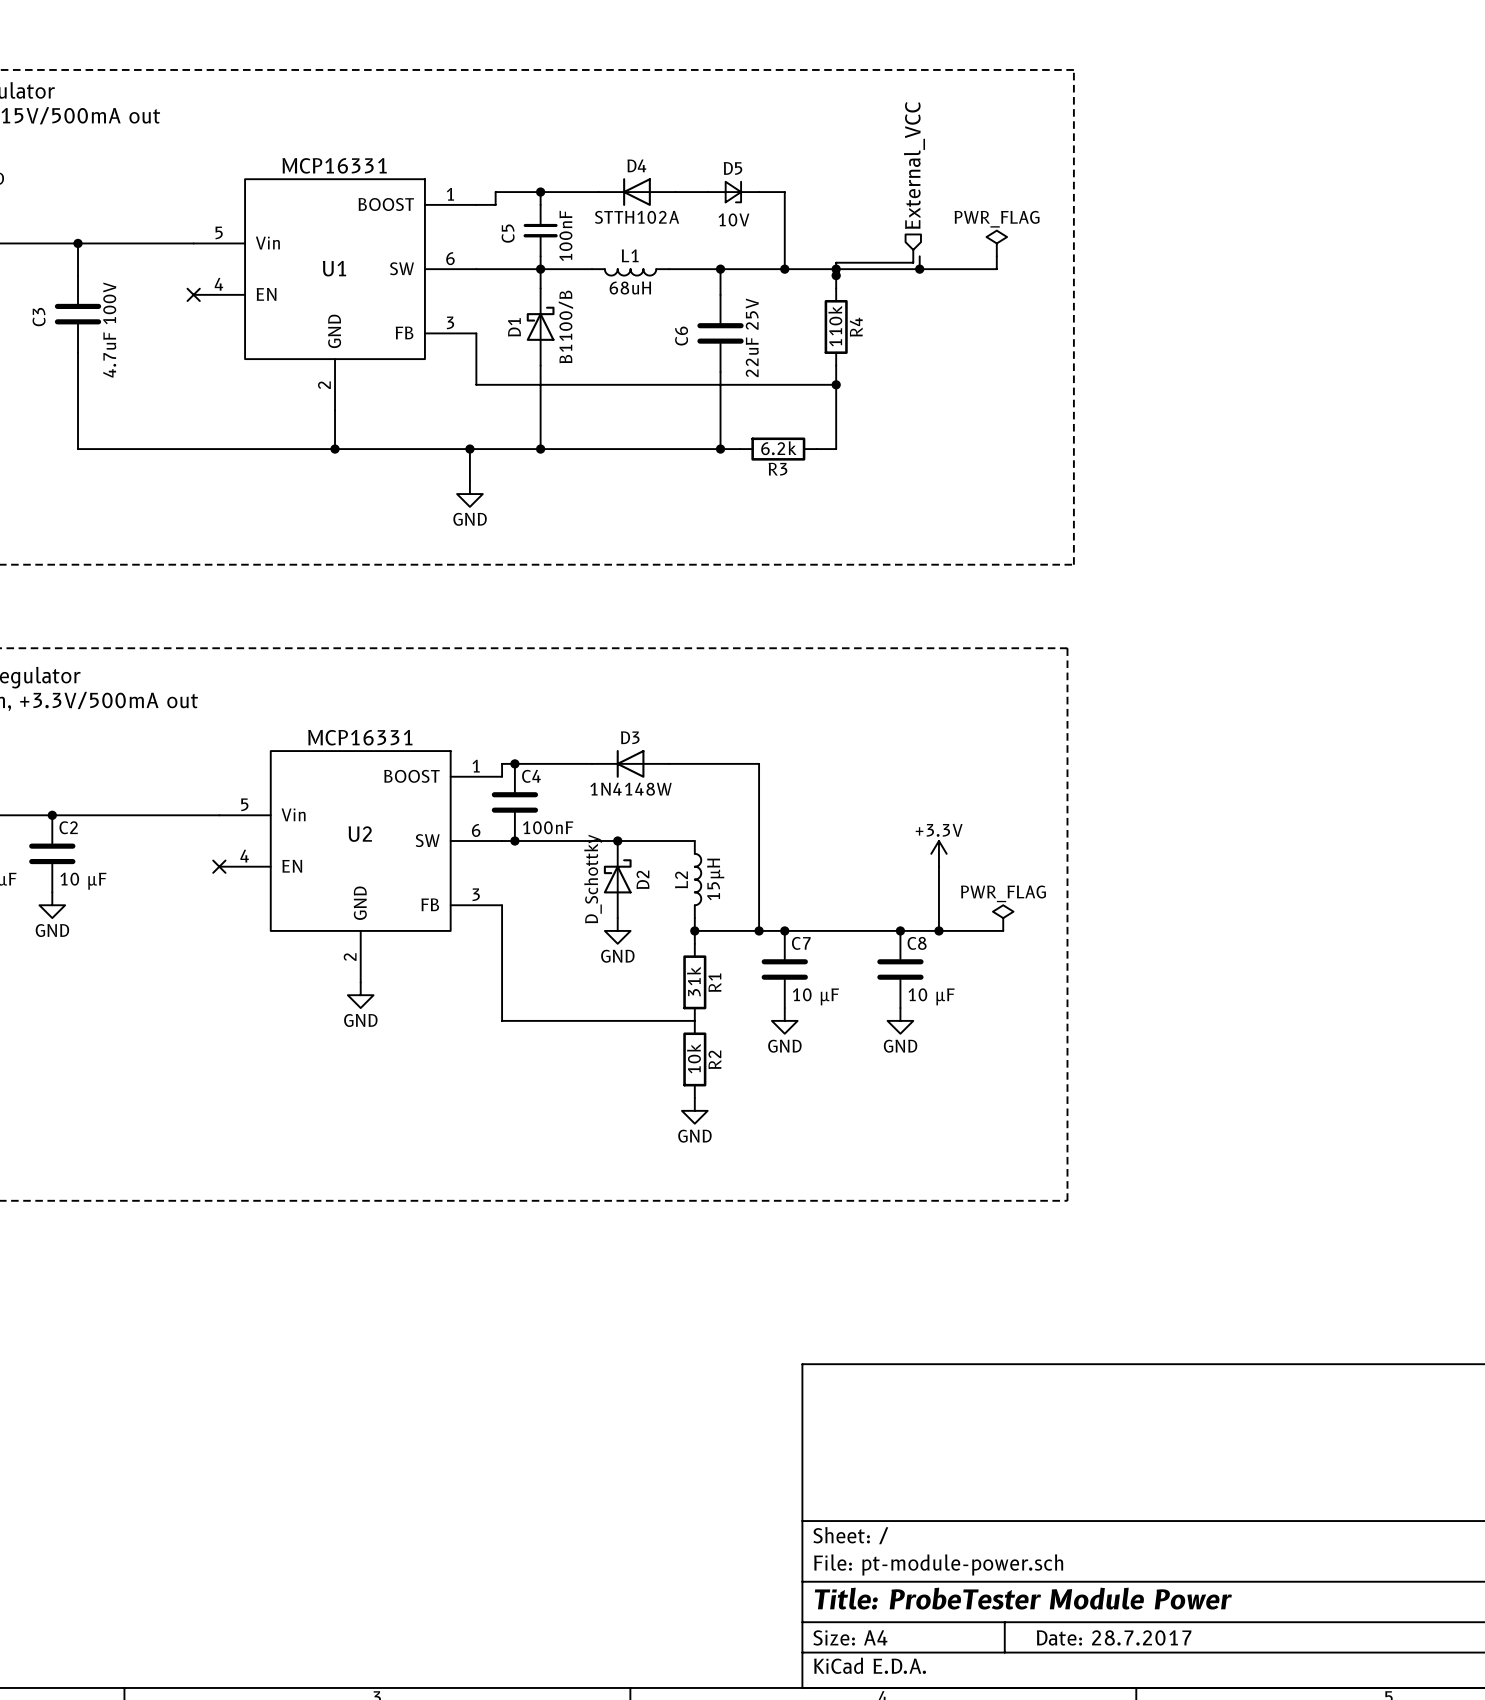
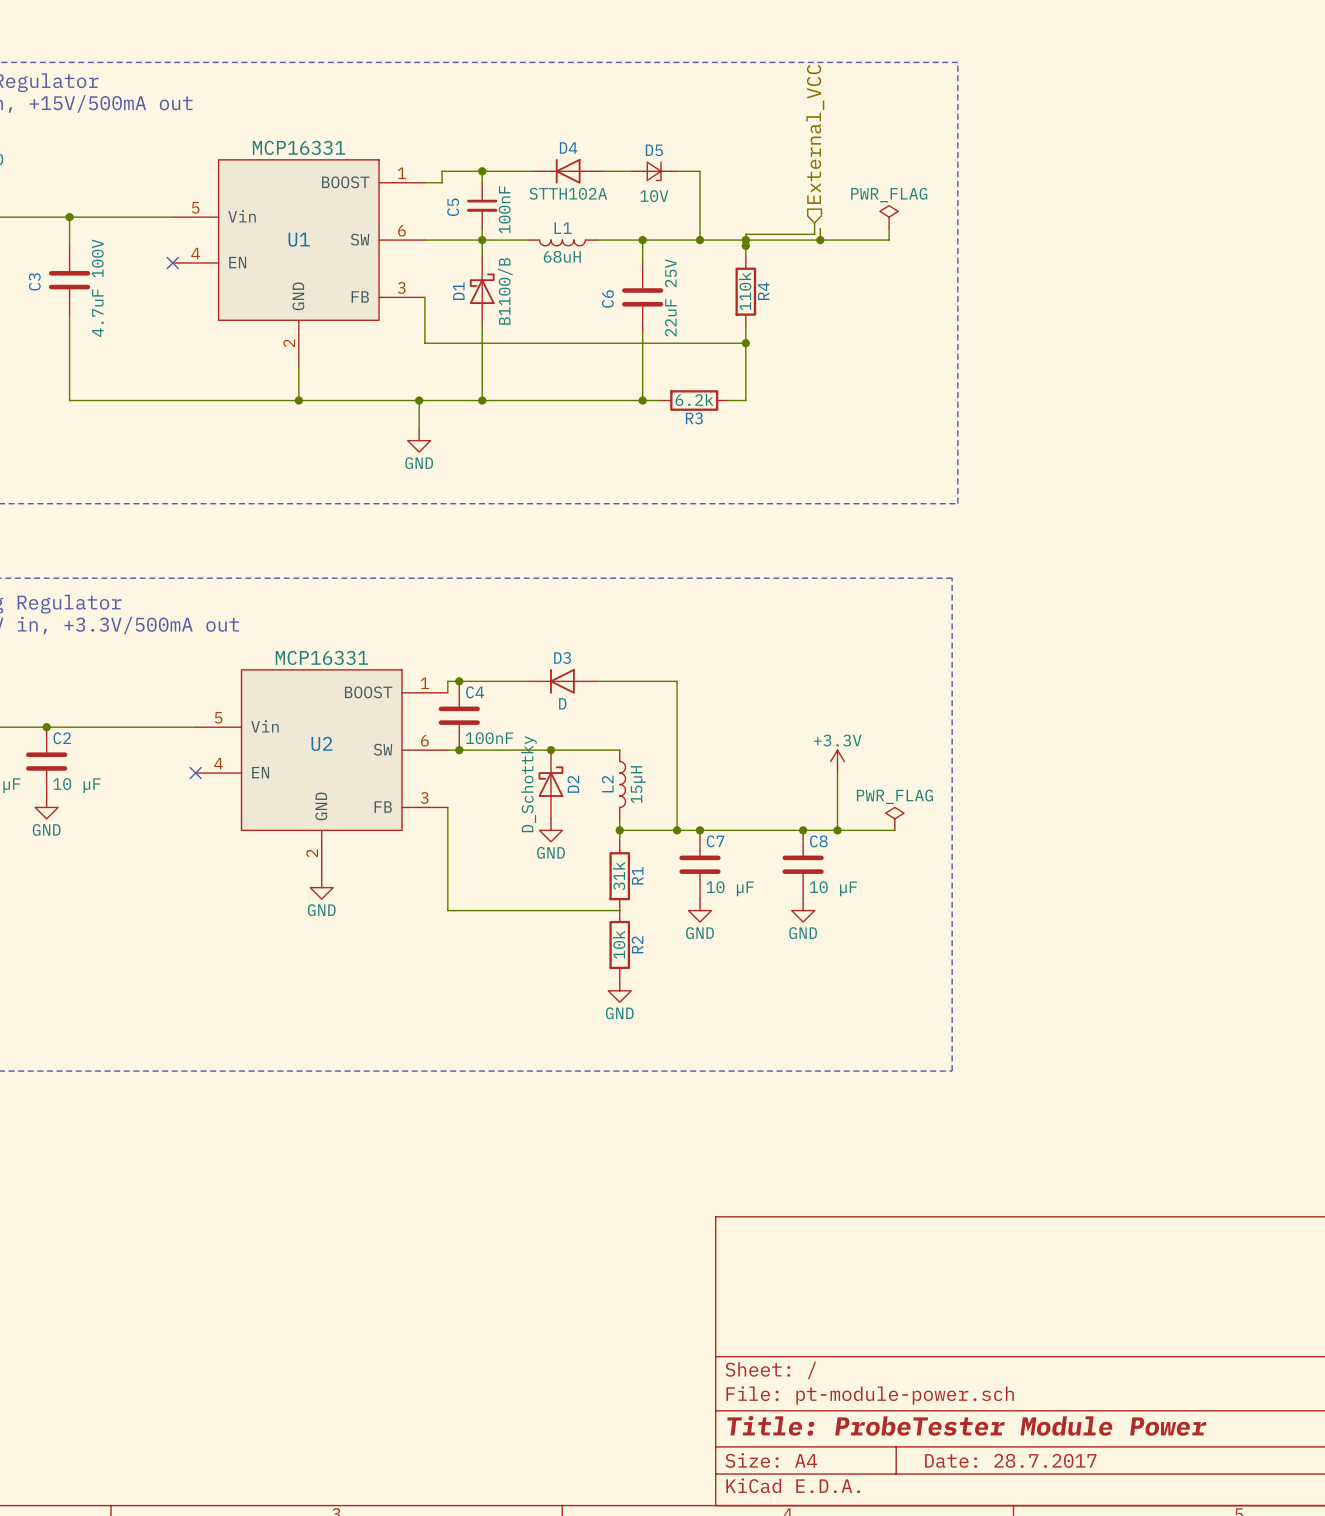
D3 value: 1N4148W (631, 789) -> D (562, 703)

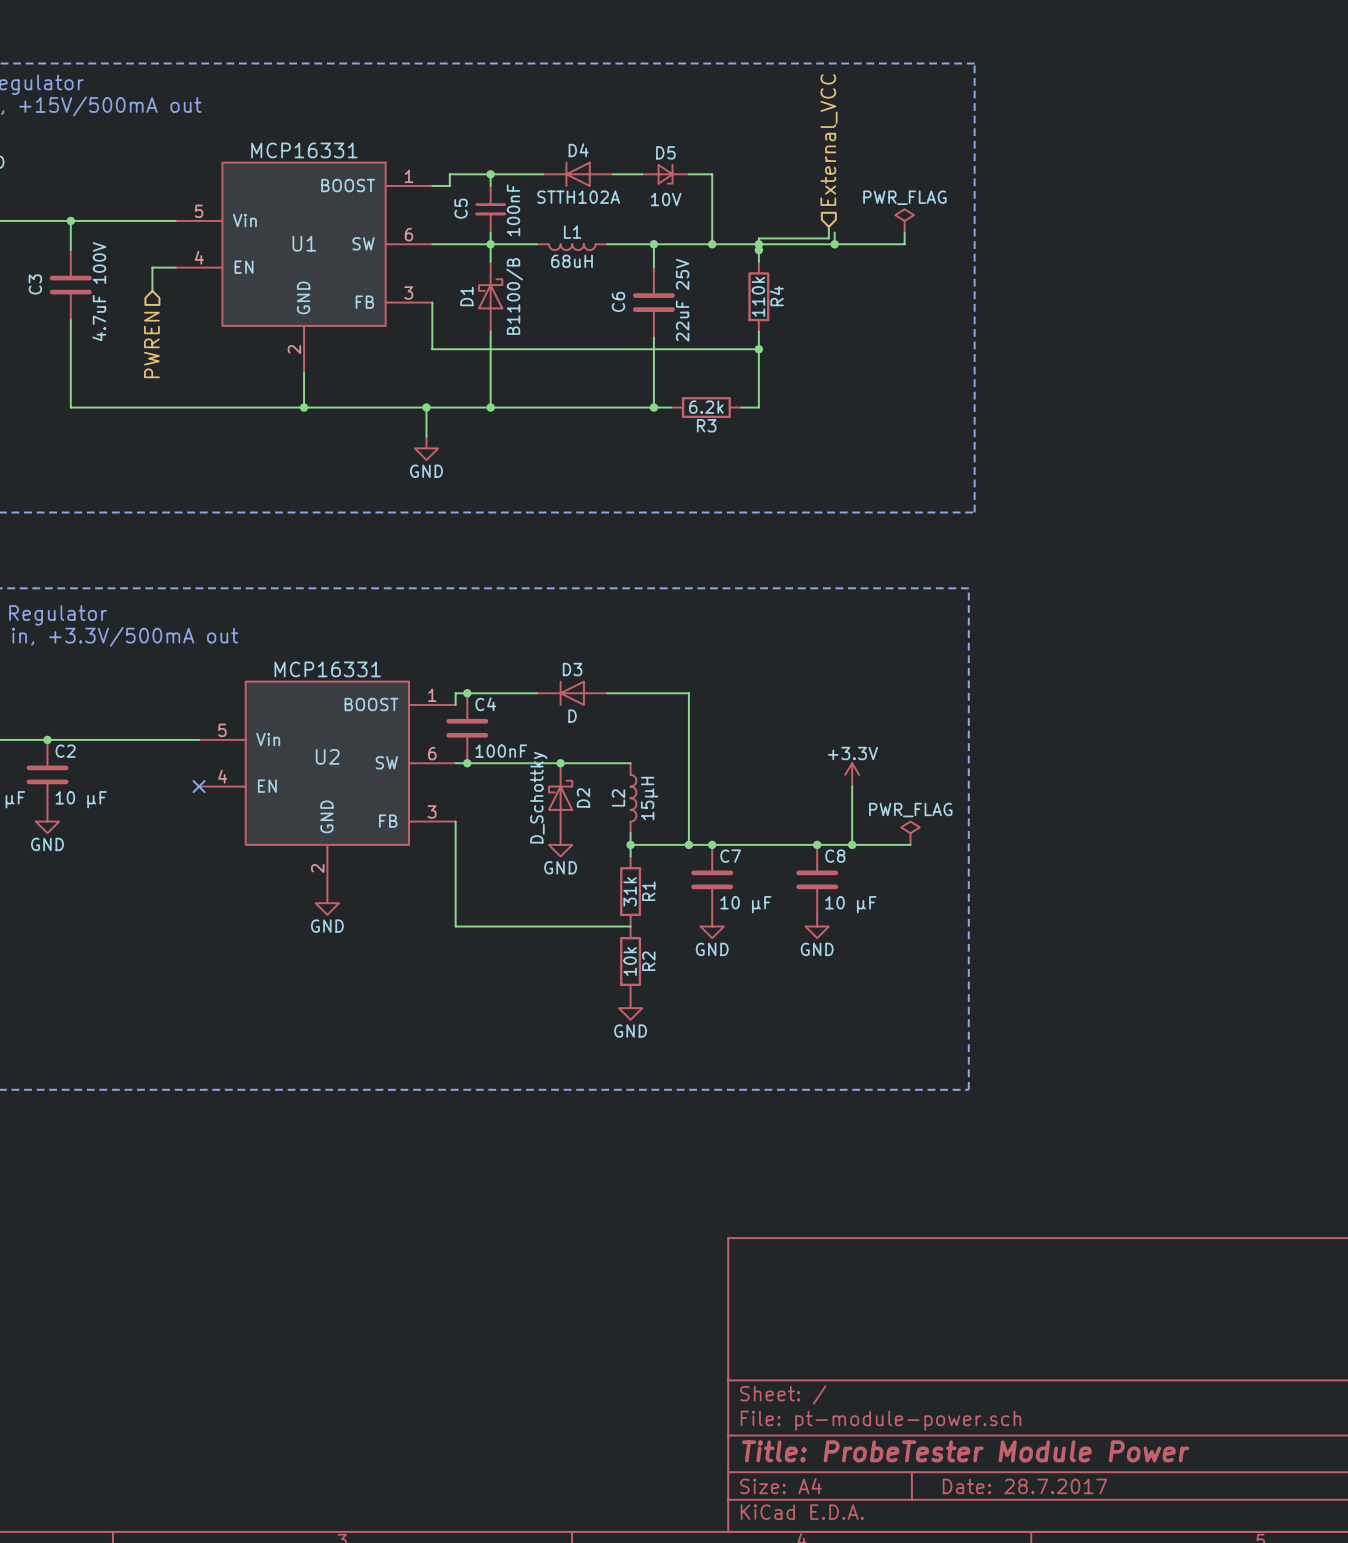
wire: none -> (175, 267) (152, 267) (152, 290)
no-connect mark: (172, 263) -> none
hierarchical label: none -> PWREN (151, 344)

